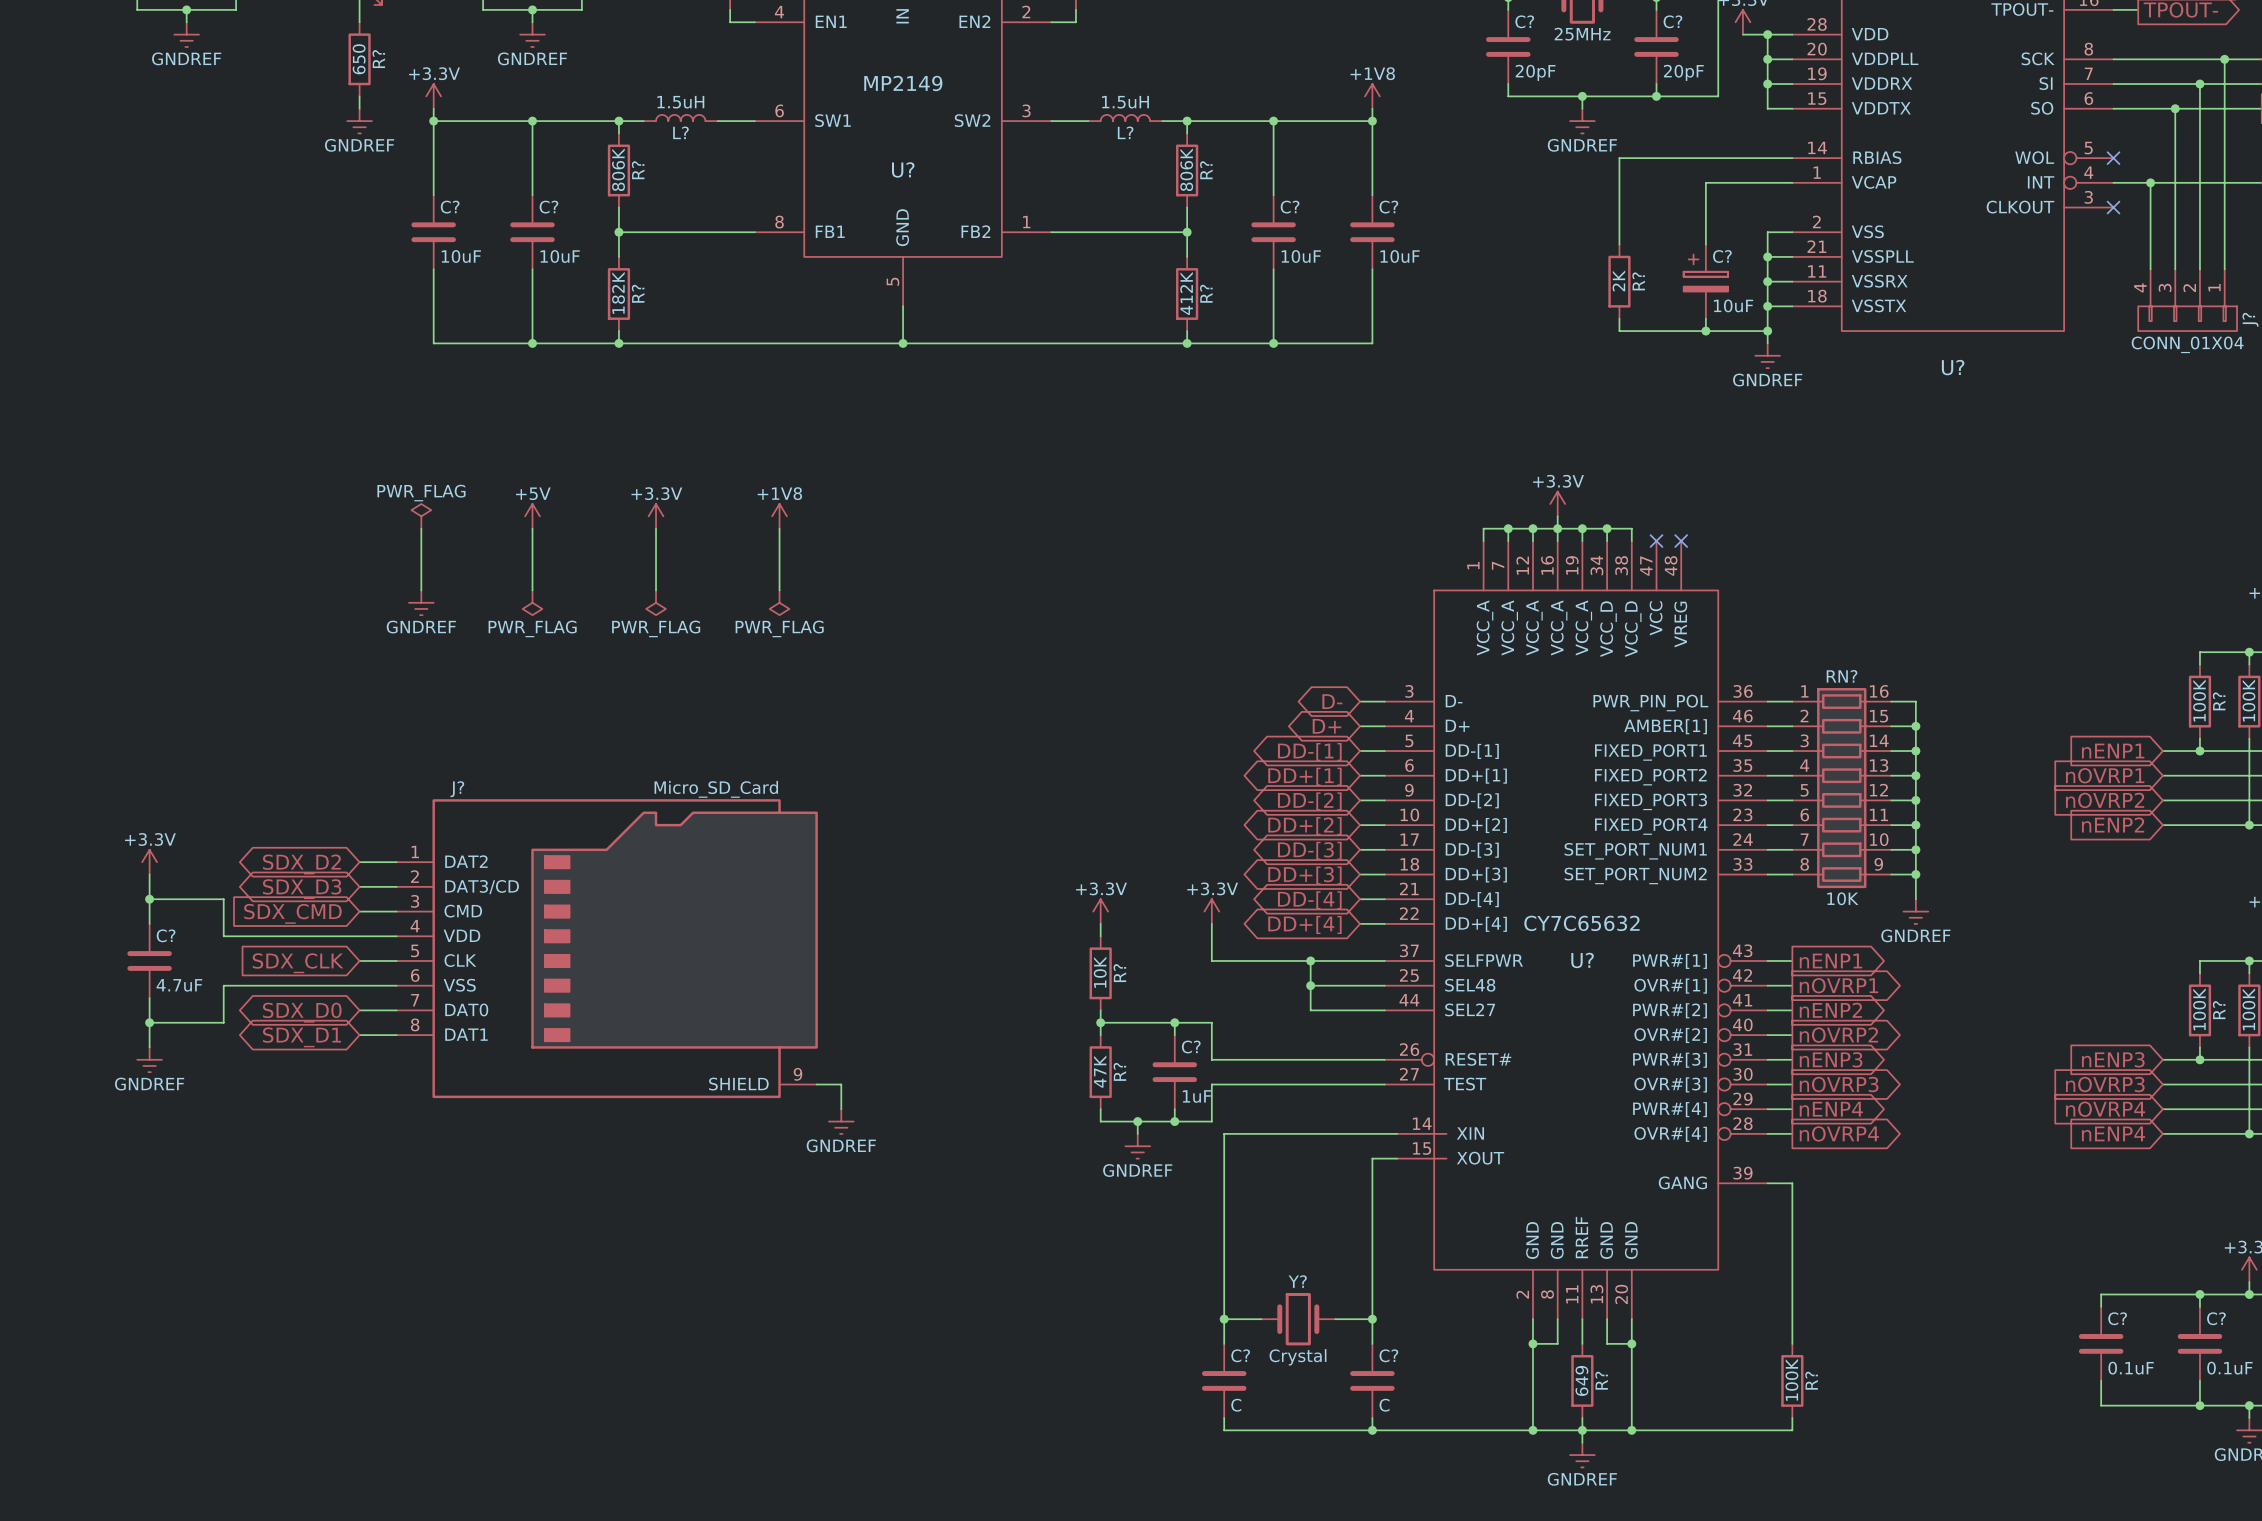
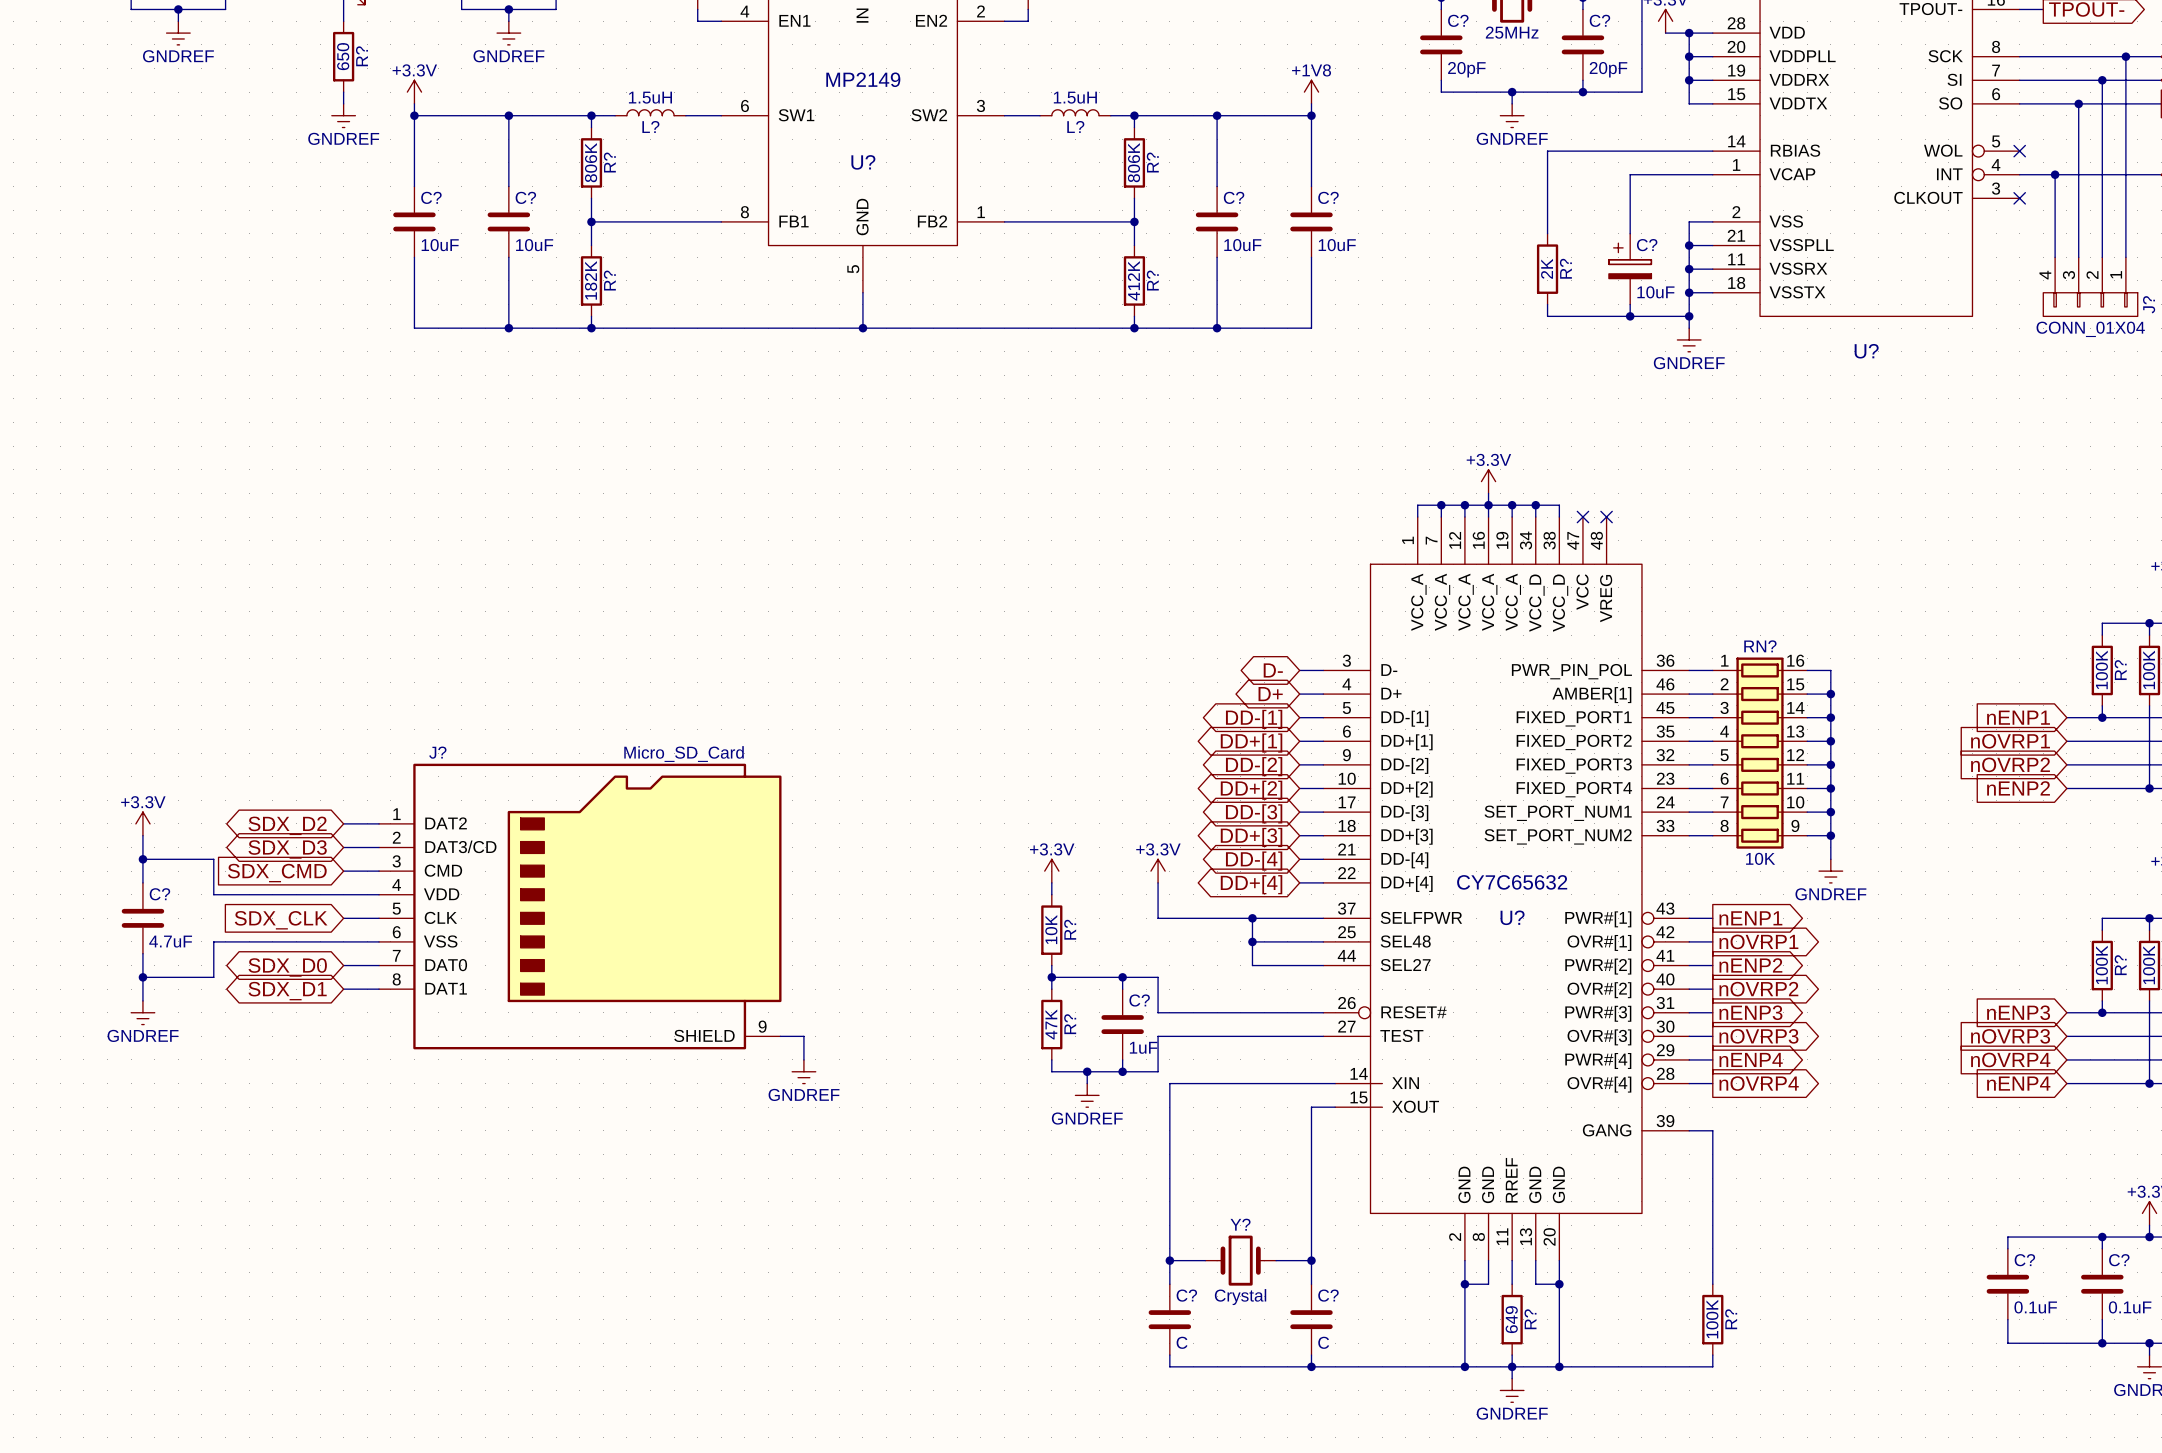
power symbol: PWR_FLAG (421, 516) -> none
power symbol: +5V (532, 516) -> none
power symbol: +3.3V (656, 516) -> none
power symbol: +1V8 (779, 516) -> none
wire: (421, 528) (421, 590) -> none
wire: (532, 528) (532, 590) -> none
wire: (656, 528) (656, 590) -> none
wire: (779, 528) (779, 590) -> none
power symbol: GNDREF (421, 602) -> none
power symbol: PWR_FLAG (532, 602) -> none
power symbol: PWR_FLAG (656, 602) -> none
power symbol: PWR_FLAG (779, 602) -> none

